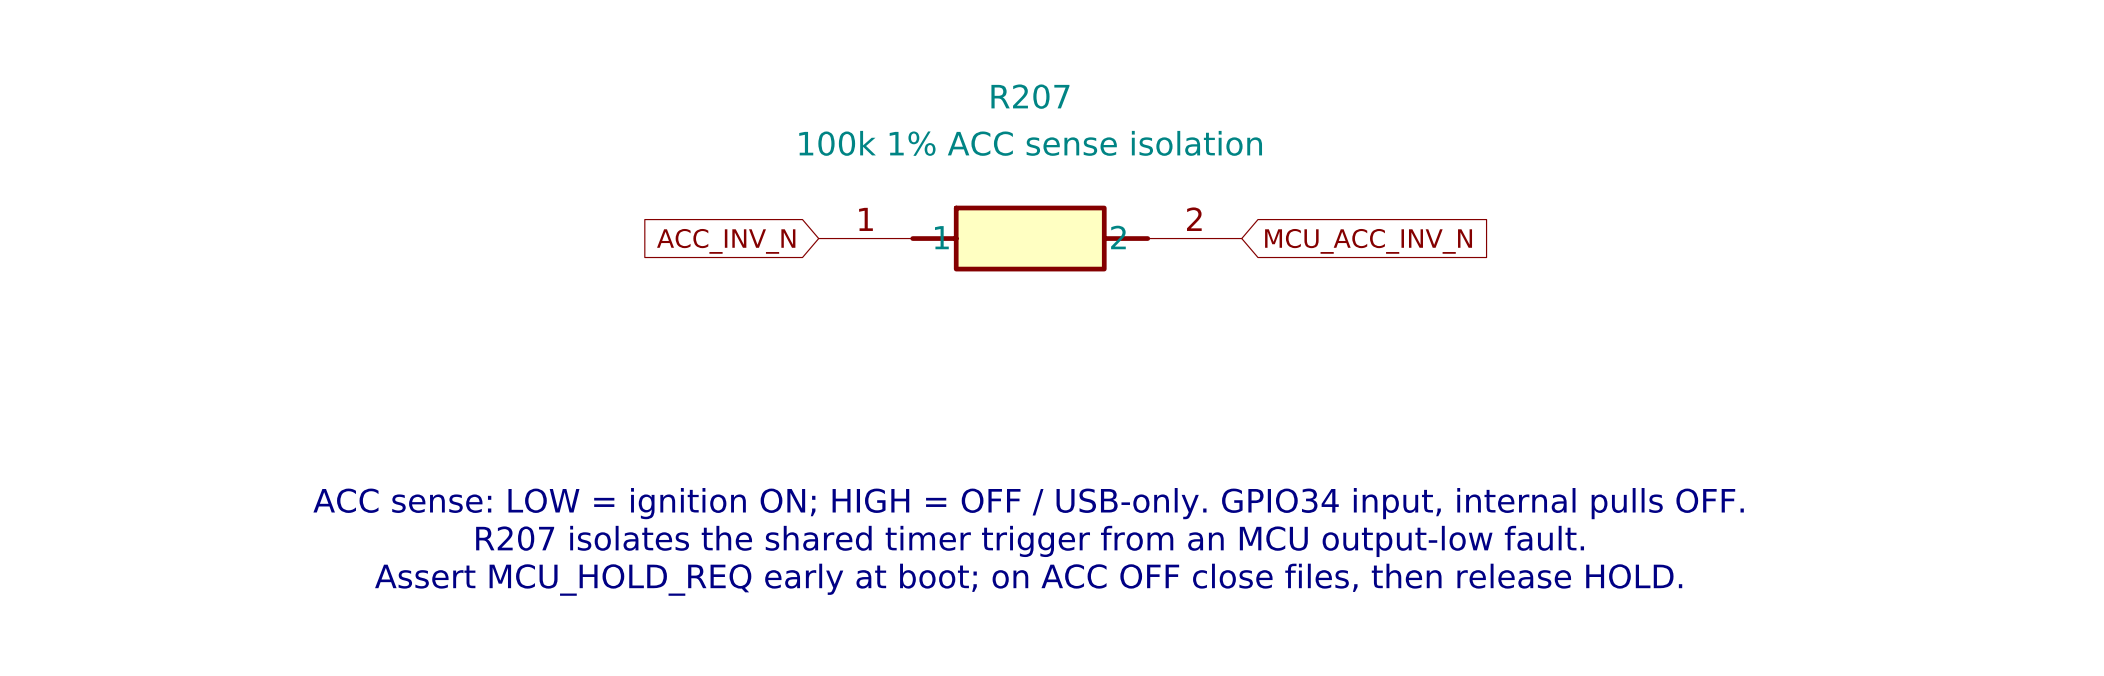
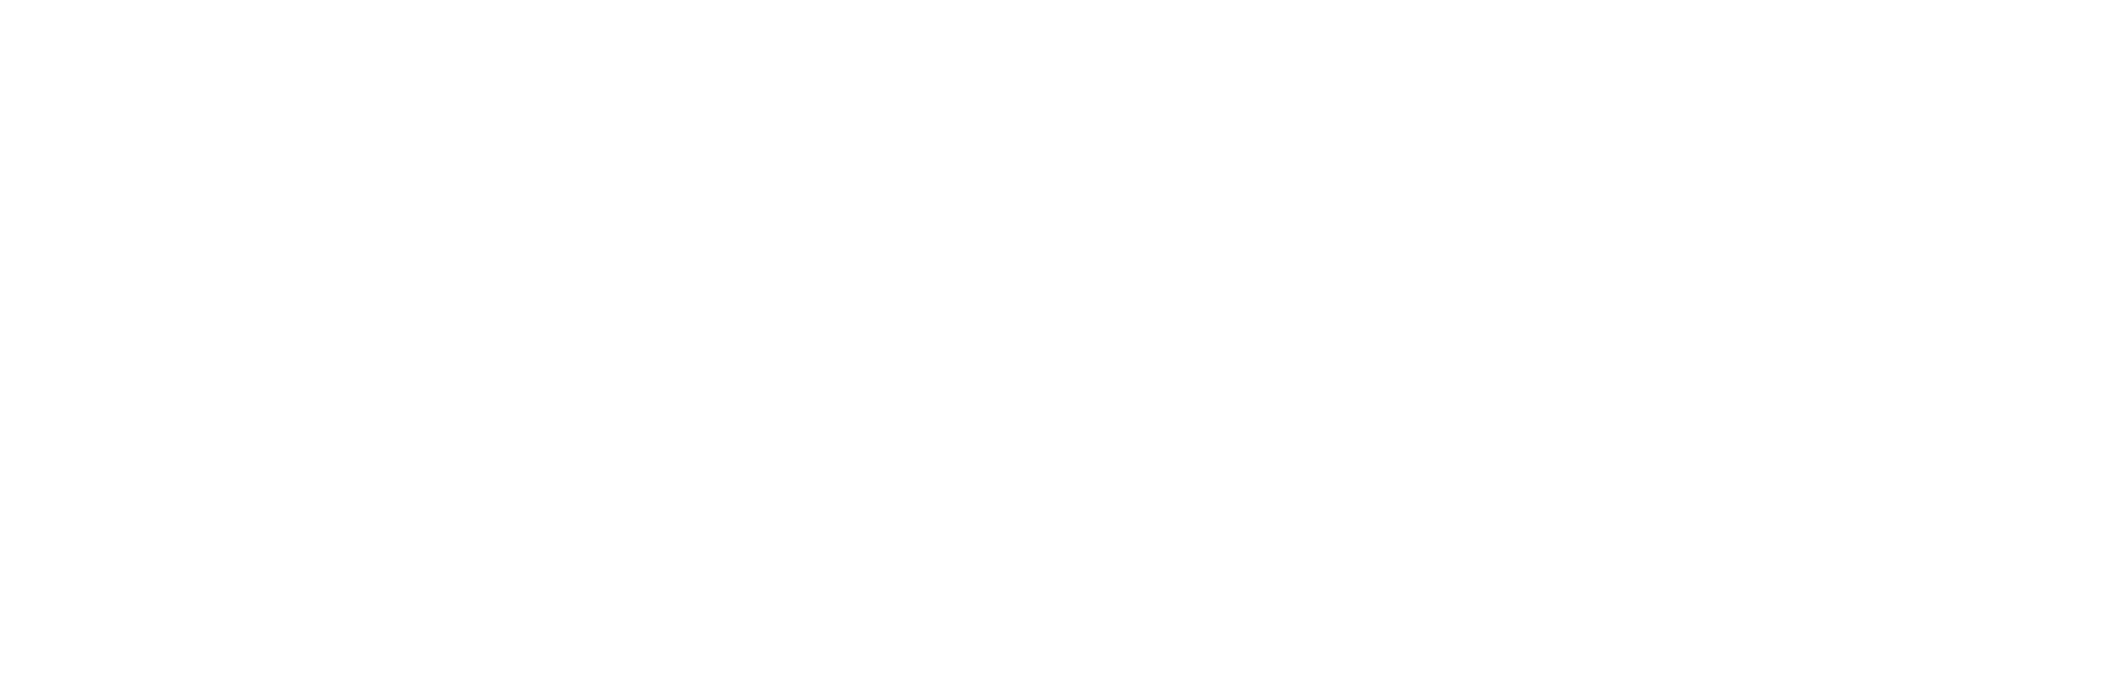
R207: 100k 1% ACC sense isolation (1030, 238) -> none
global label: ACC_INV_N (726, 241) -> none
global label: MCU_ACC_INV_N (1368, 241) -> none
text: ACC sense: LOW = ignition ON; HIGH = OFF / USB-only. GPIO34 input, internal pulls OFF. (1028, 503) -> none
text: R207 isolates the shared timer trigger from an MCU output-low fault. (1030, 541) -> none
text: Assert MCU_HOLD_REQ early at boot; on ACC OFF close files, then release HOLD. (1028, 579) -> none

